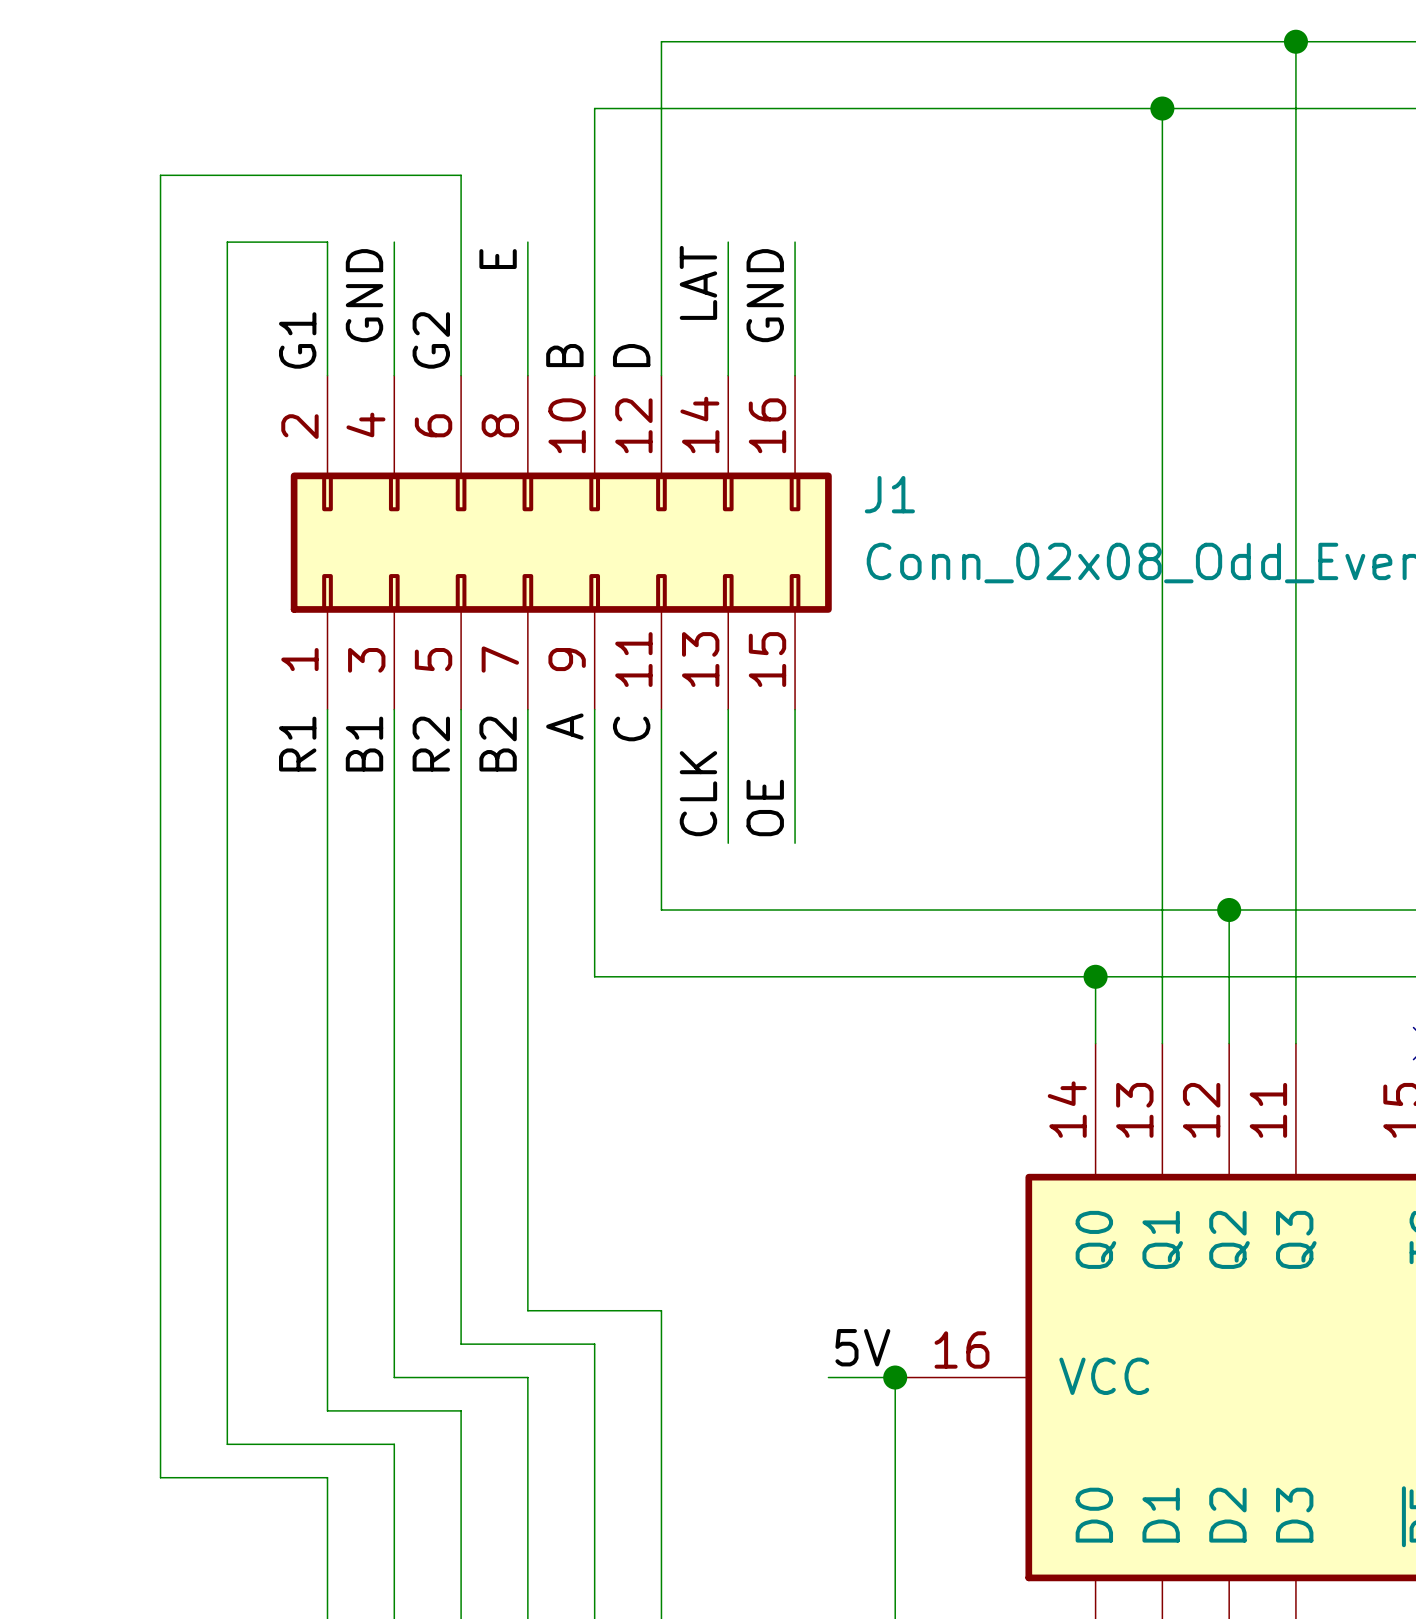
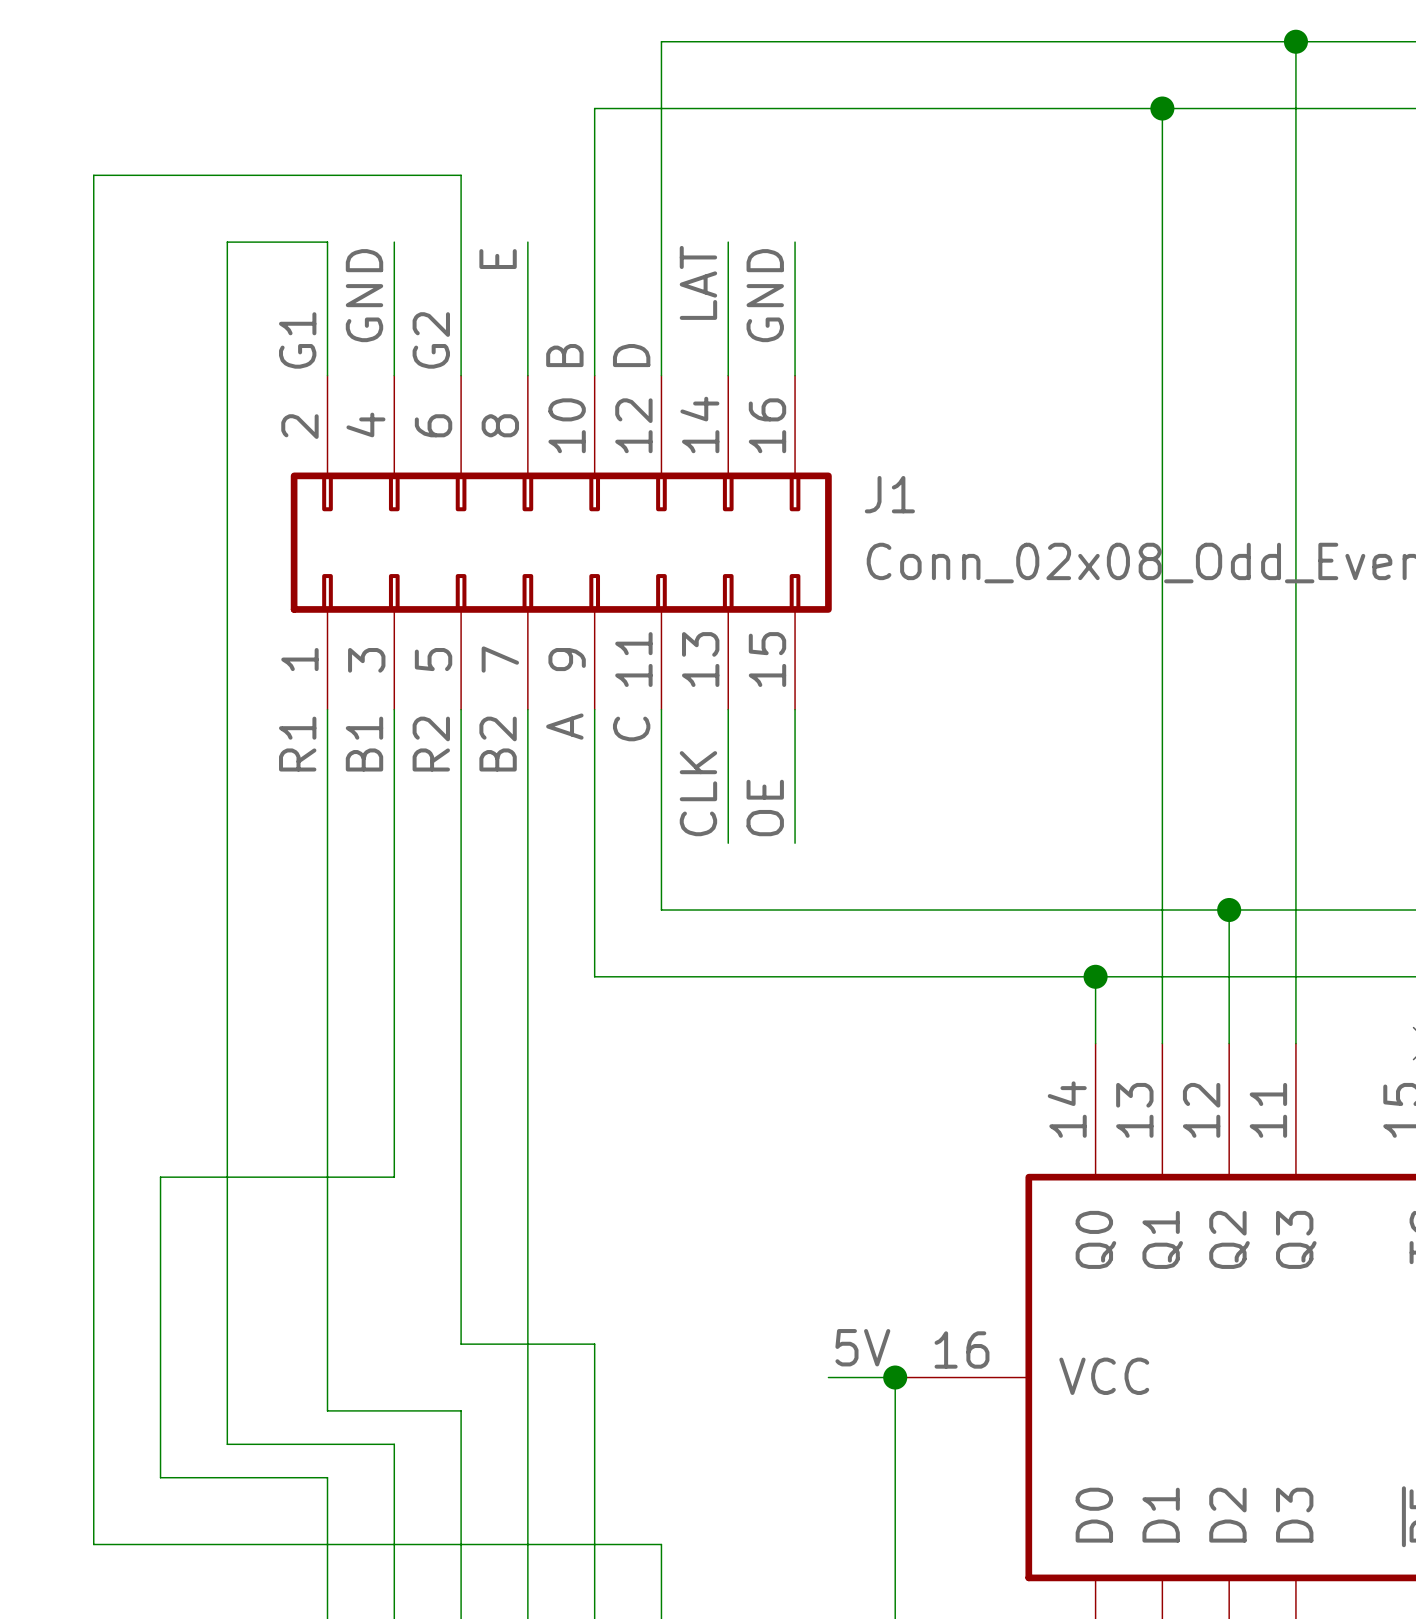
wire: (160, 175) (160, 1177) -> (160, 175) (93, 175) (93, 1544) (661, 1544)
wire: none -> (160, 1177) (394, 1177)
wire: (394, 1177) (394, 1377) (527, 1377) -> (527, 1310) (527, 1377)
wire: (527, 1310) (661, 1310) (661, 1544) -> none

